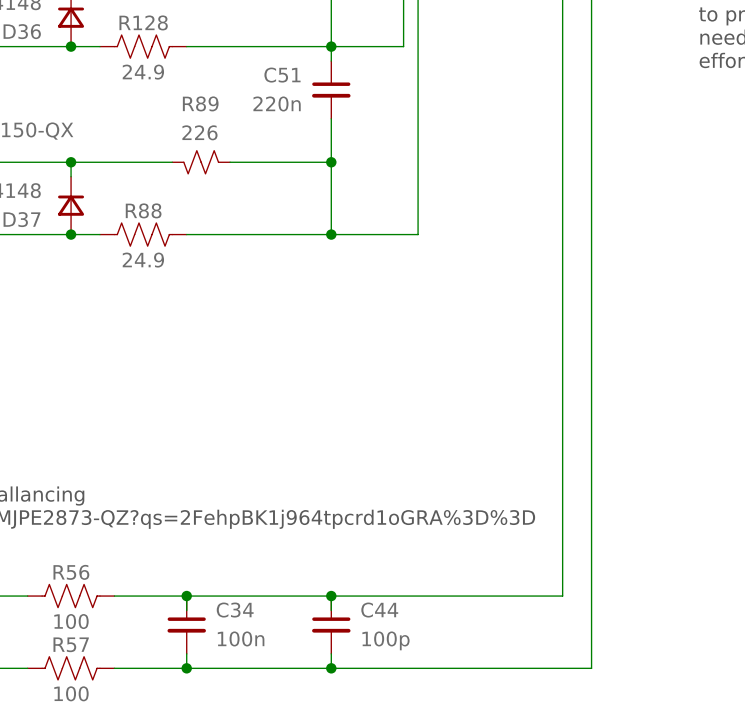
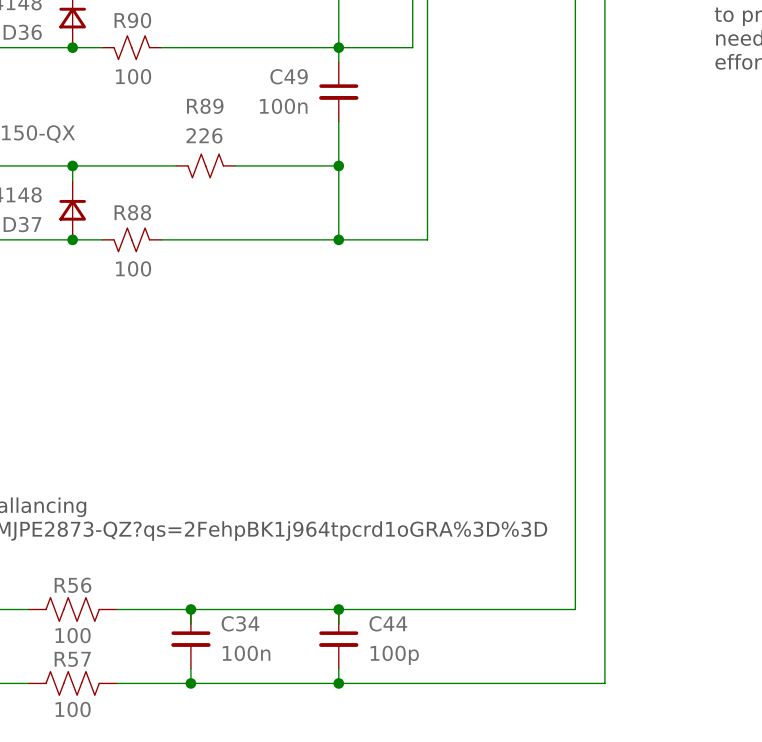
R90: none -> 100 (131, 47)
R128: 24.9 (143, 46) -> none
C51 name: C51 (282, 75) -> C49 (289, 76)
C51 value: 220n (277, 103) -> 100n (283, 106)
R88 symbol: [99, 223, 187, 247] -> [102, 228, 162, 252]
R88 value: 24.9 (143, 260) -> 100 (133, 268)

